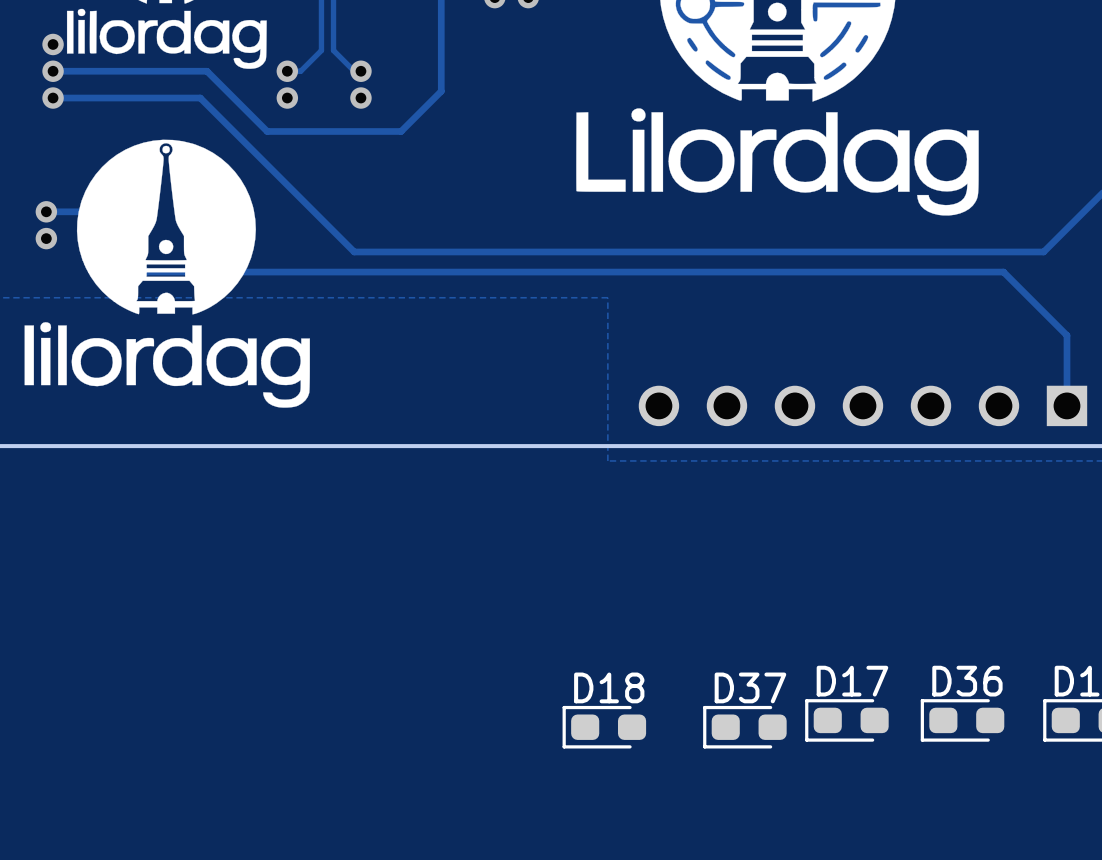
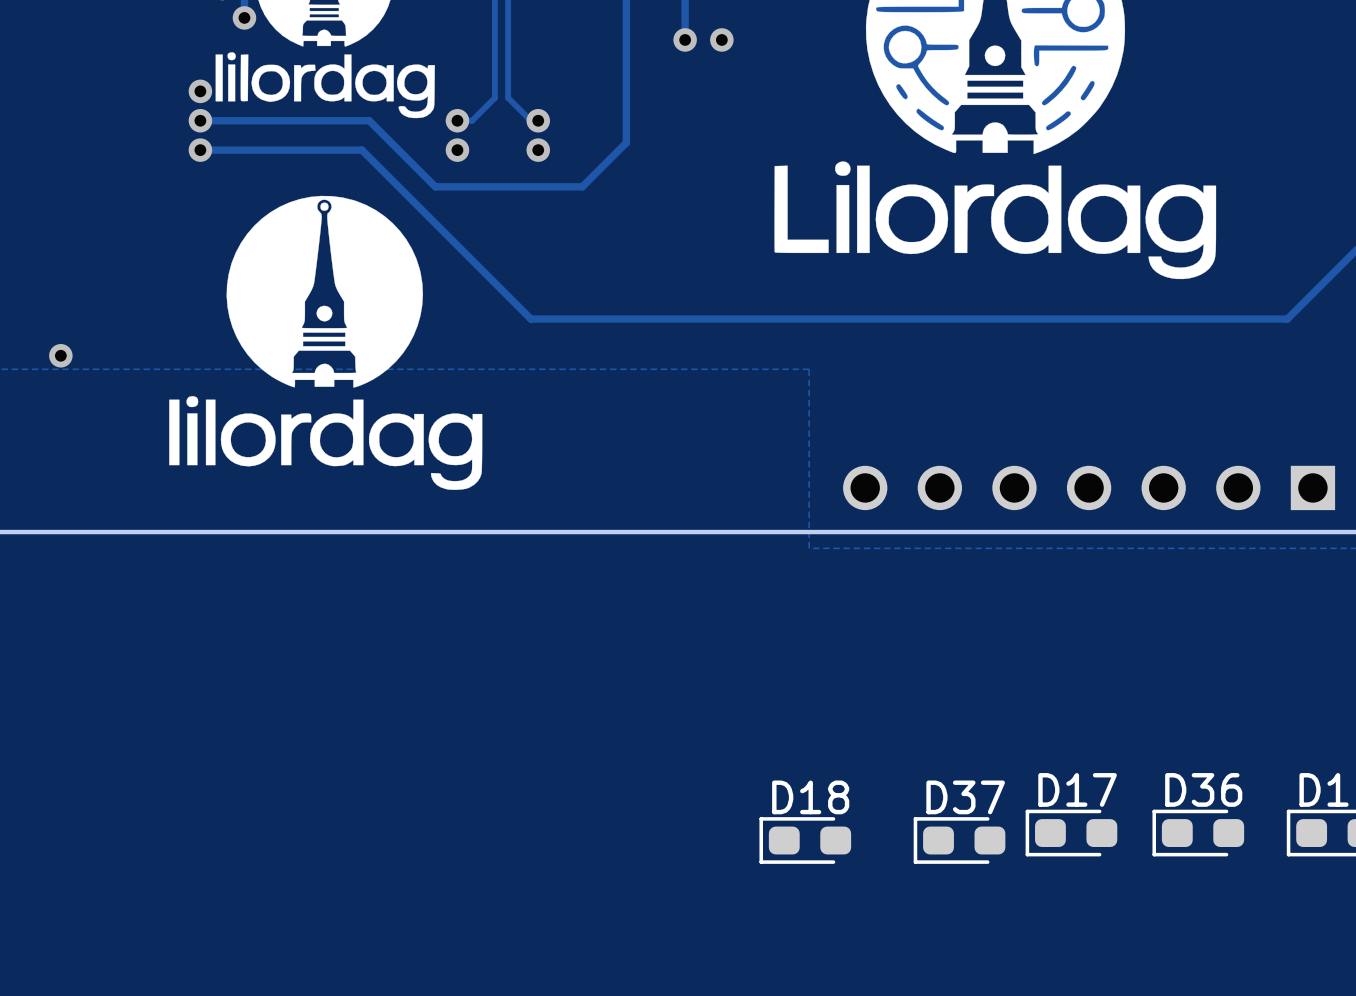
track: (46, 211) (86, 211) (146, 272) (1003, 272) (1066, 335) (1066, 405) -> none
via: (46, 211) -> none
via: (46, 238) -> none

